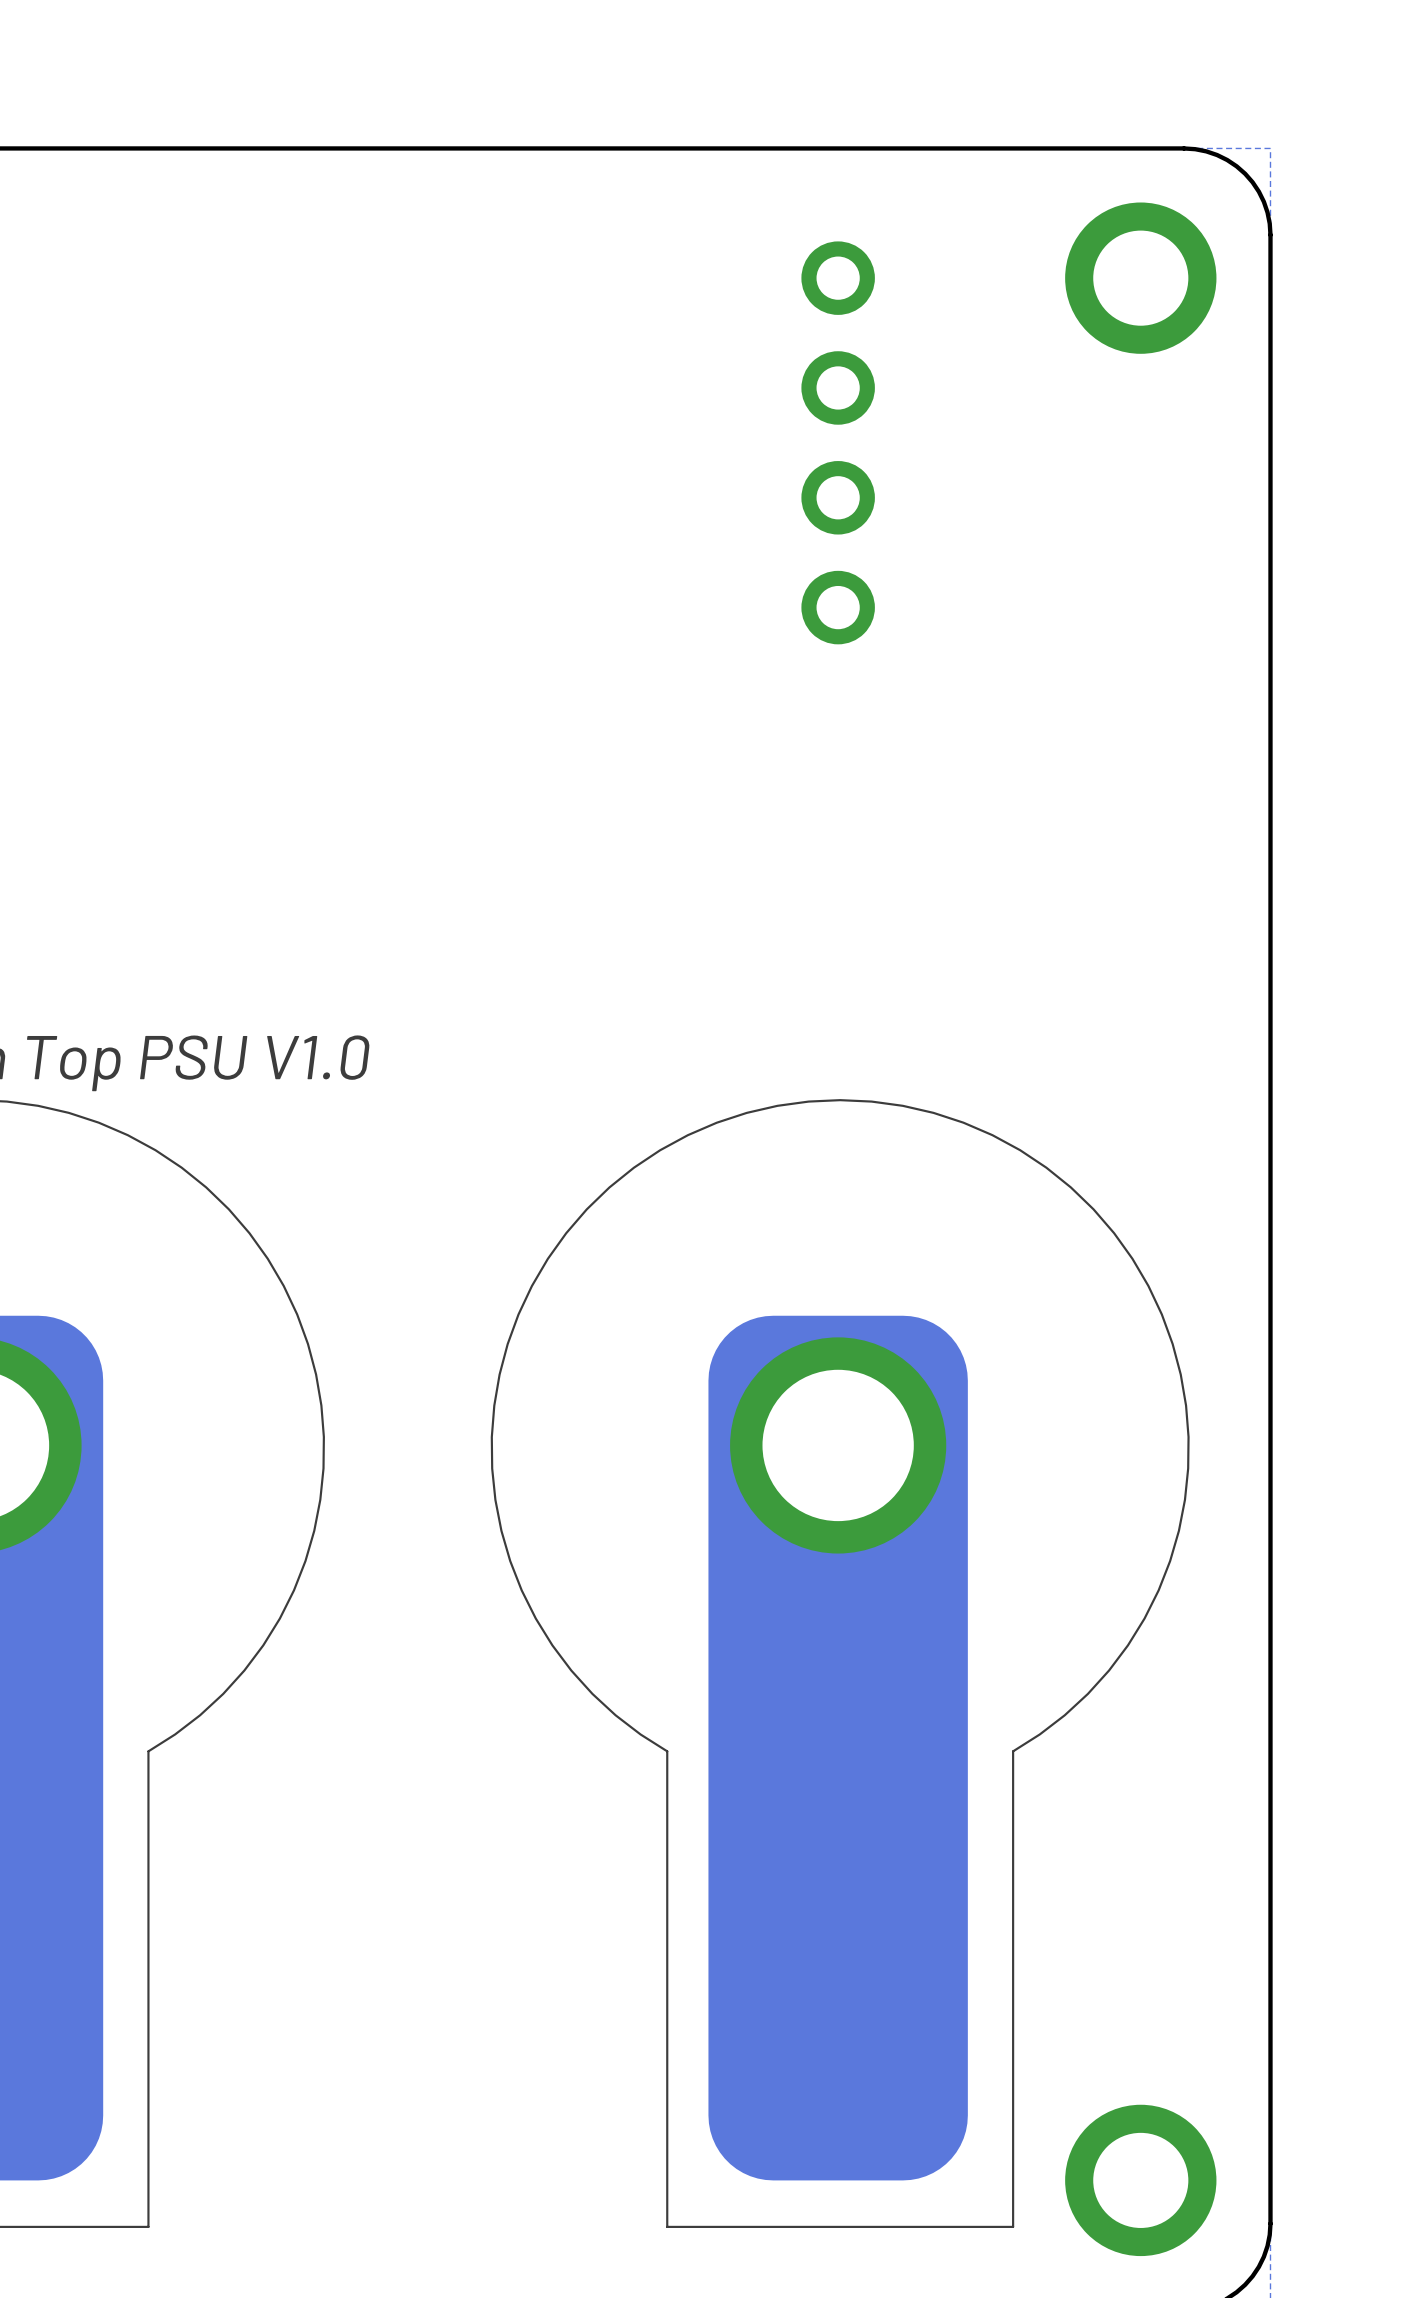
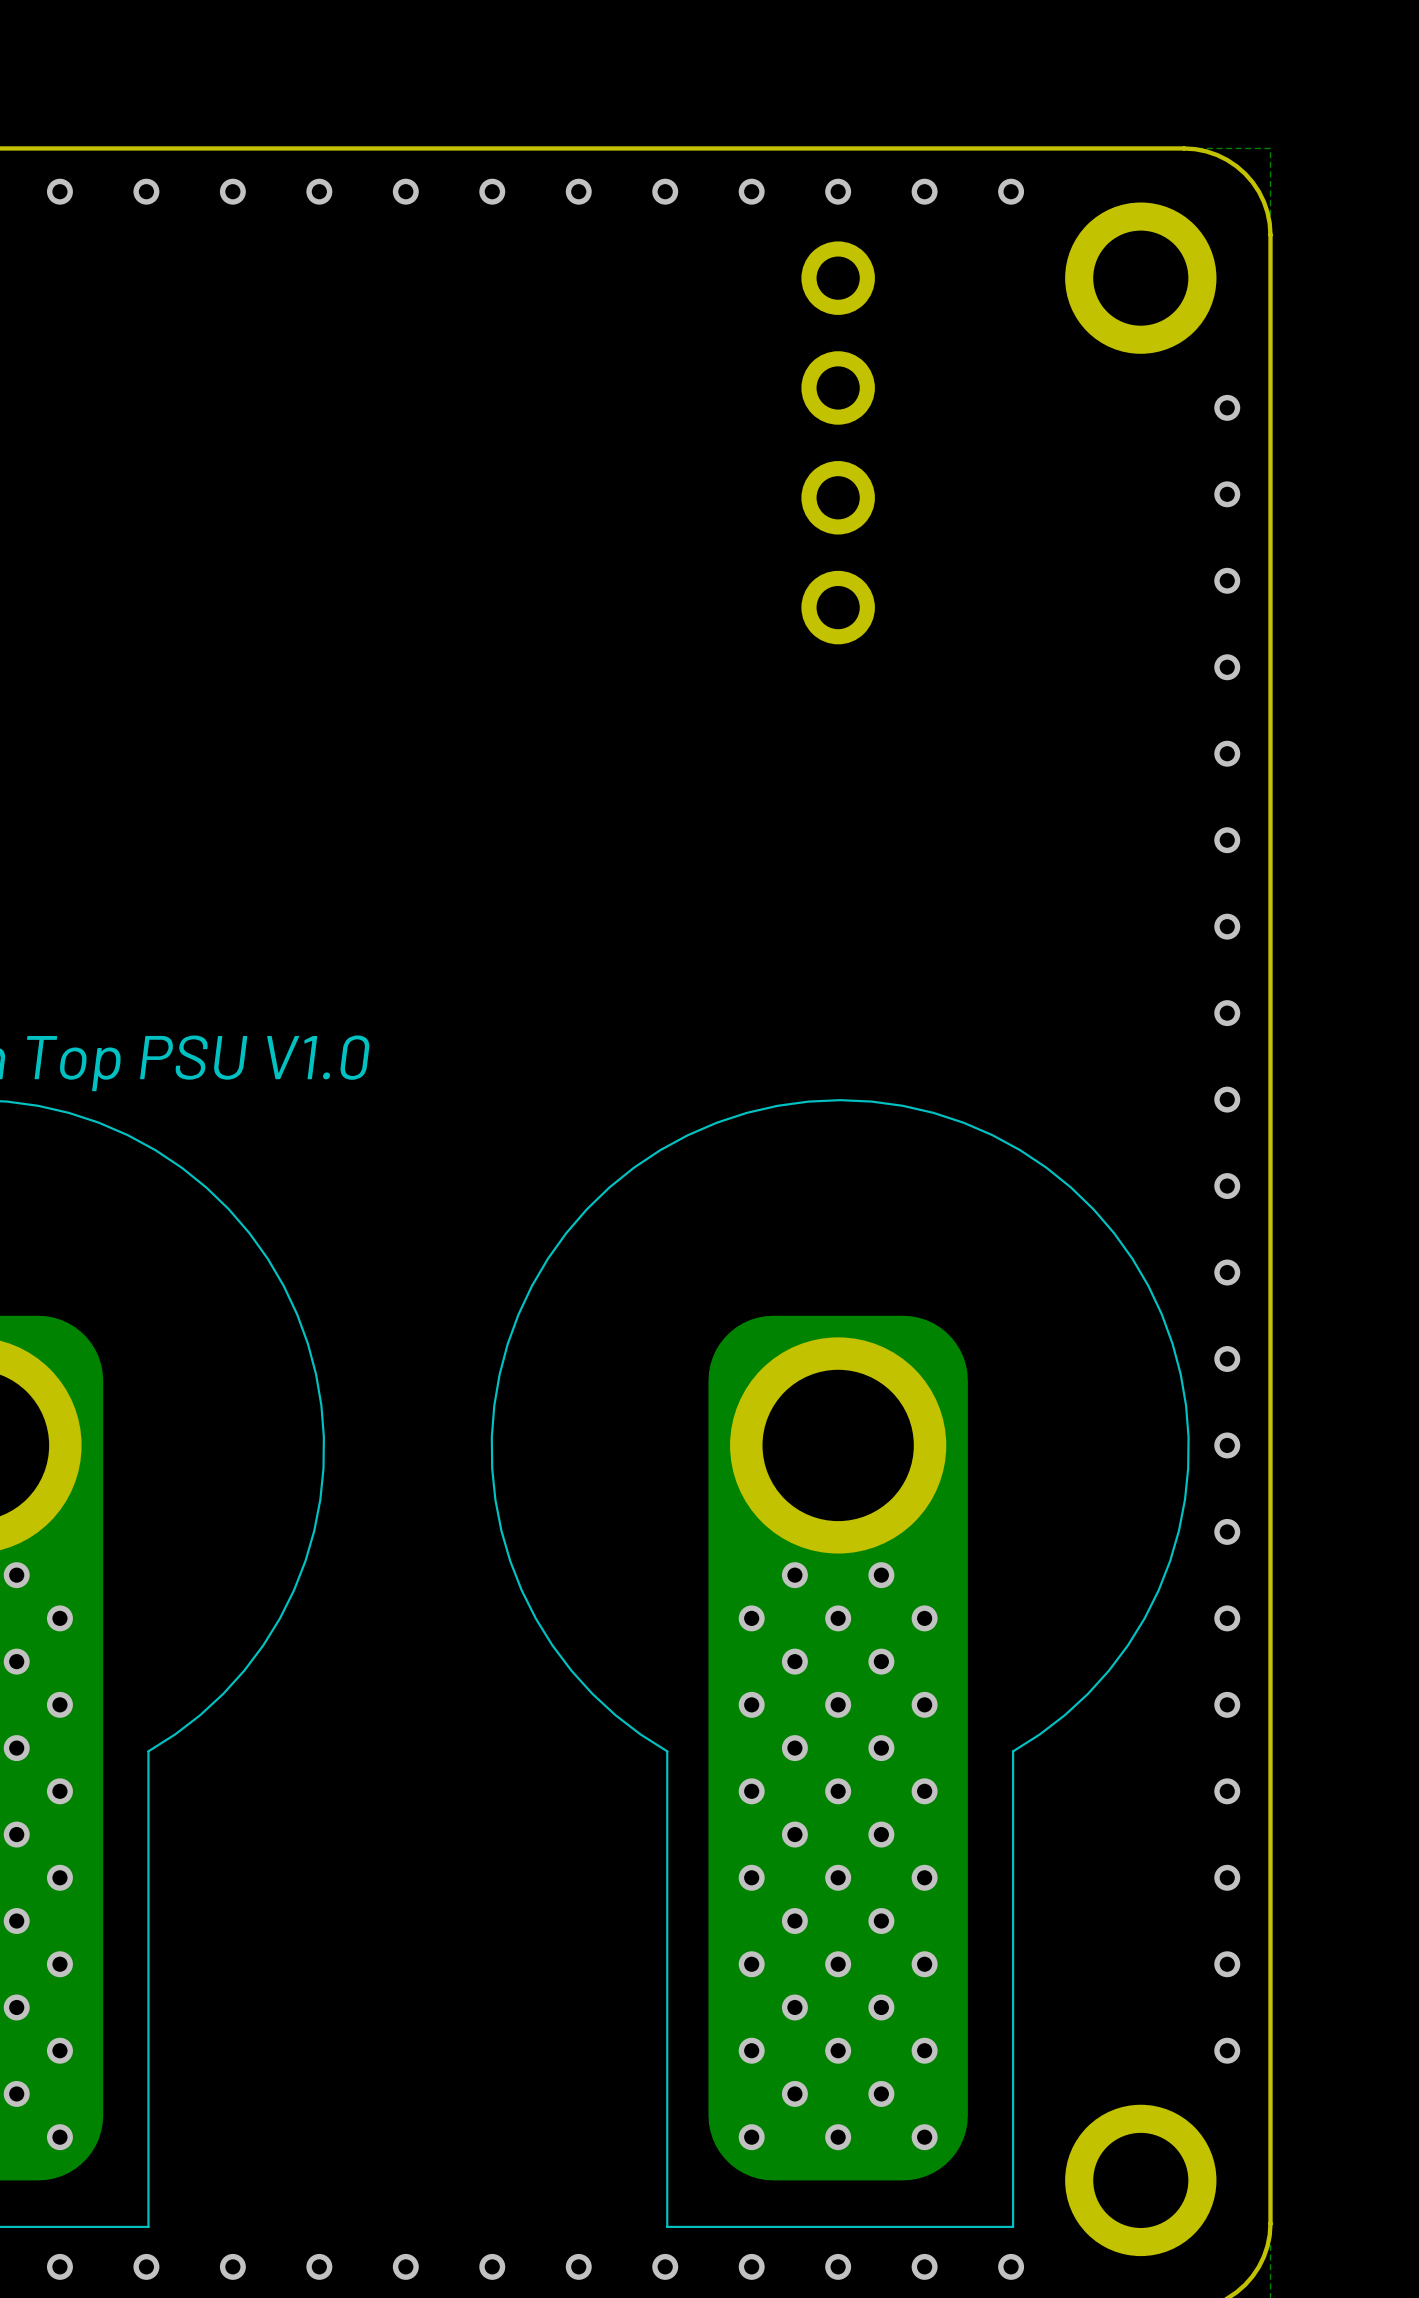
via: none -> (59, 191)
via: none -> (146, 191)
via: none -> (232, 191)
via: none -> (319, 191)
via: none -> (405, 191)
via: none -> (492, 191)
via: none -> (578, 191)
via: none -> (665, 191)
via: none -> (751, 191)
via: none -> (838, 191)
via: none -> (924, 191)
via: none -> (1011, 191)
via: none -> (1227, 407)
via: none -> (1227, 494)
via: none -> (1227, 580)
via: none -> (1227, 667)
via: none -> (1227, 753)
via: none -> (1227, 840)
via: none -> (1227, 926)
via: none -> (1227, 1013)
via: none -> (1227, 1099)
via: none -> (1227, 1186)
via: none -> (1227, 1272)
via: none -> (1227, 1358)
via: none -> (1227, 1445)
via: none -> (1227, 1531)
via: none -> (16, 1575)
via: none -> (794, 1575)
via: none -> (881, 1575)
via: none -> (59, 1618)
via: none -> (751, 1618)
via: none -> (838, 1618)
via: none -> (924, 1618)
via: none -> (1227, 1618)
via: none -> (16, 1661)
via: none -> (794, 1661)
via: none -> (881, 1661)
via: none -> (59, 1704)
via: none -> (751, 1704)
via: none -> (838, 1704)
via: none -> (924, 1704)
via: none -> (1227, 1704)
via: none -> (16, 1748)
via: none -> (794, 1748)
via: none -> (881, 1748)
via: none -> (59, 1791)
via: none -> (751, 1791)
via: none -> (838, 1791)
via: none -> (924, 1791)
via: none -> (1227, 1791)
via: none -> (16, 1834)
via: none -> (794, 1834)
via: none -> (881, 1834)
via: none -> (59, 1877)
via: none -> (751, 1877)
via: none -> (838, 1877)
via: none -> (924, 1877)
via: none -> (1227, 1877)
via: none -> (16, 1921)
via: none -> (794, 1921)
via: none -> (881, 1921)
via: none -> (59, 1964)
via: none -> (751, 1964)
via: none -> (838, 1964)
via: none -> (924, 1964)
via: none -> (1227, 1964)
via: none -> (16, 2007)
via: none -> (794, 2007)
via: none -> (881, 2007)
via: none -> (59, 2050)
via: none -> (751, 2050)
via: none -> (838, 2050)
via: none -> (924, 2050)
via: none -> (1227, 2050)
via: none -> (16, 2093)
via: none -> (794, 2093)
via: none -> (881, 2093)
via: none -> (59, 2137)
via: none -> (751, 2137)
via: none -> (838, 2137)
via: none -> (924, 2137)
via: none -> (59, 2266)
via: none -> (146, 2266)
via: none -> (232, 2266)
via: none -> (319, 2266)
via: none -> (405, 2266)
via: none -> (492, 2266)
via: none -> (578, 2266)
via: none -> (665, 2266)
via: none -> (751, 2266)
via: none -> (838, 2266)
via: none -> (924, 2266)
via: none -> (1011, 2266)

